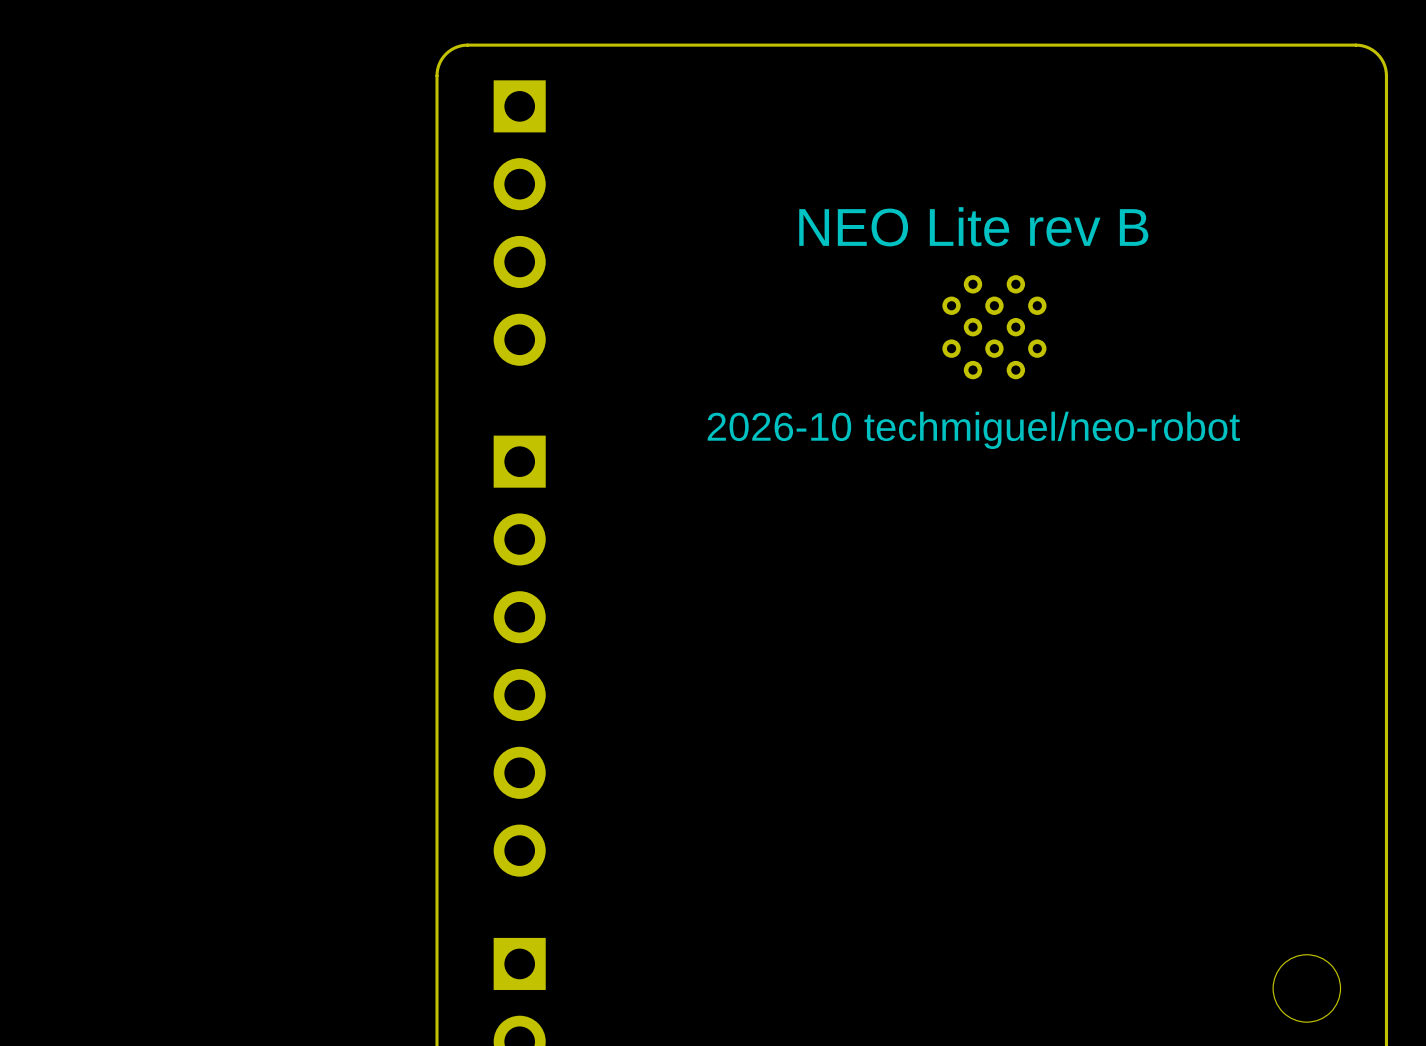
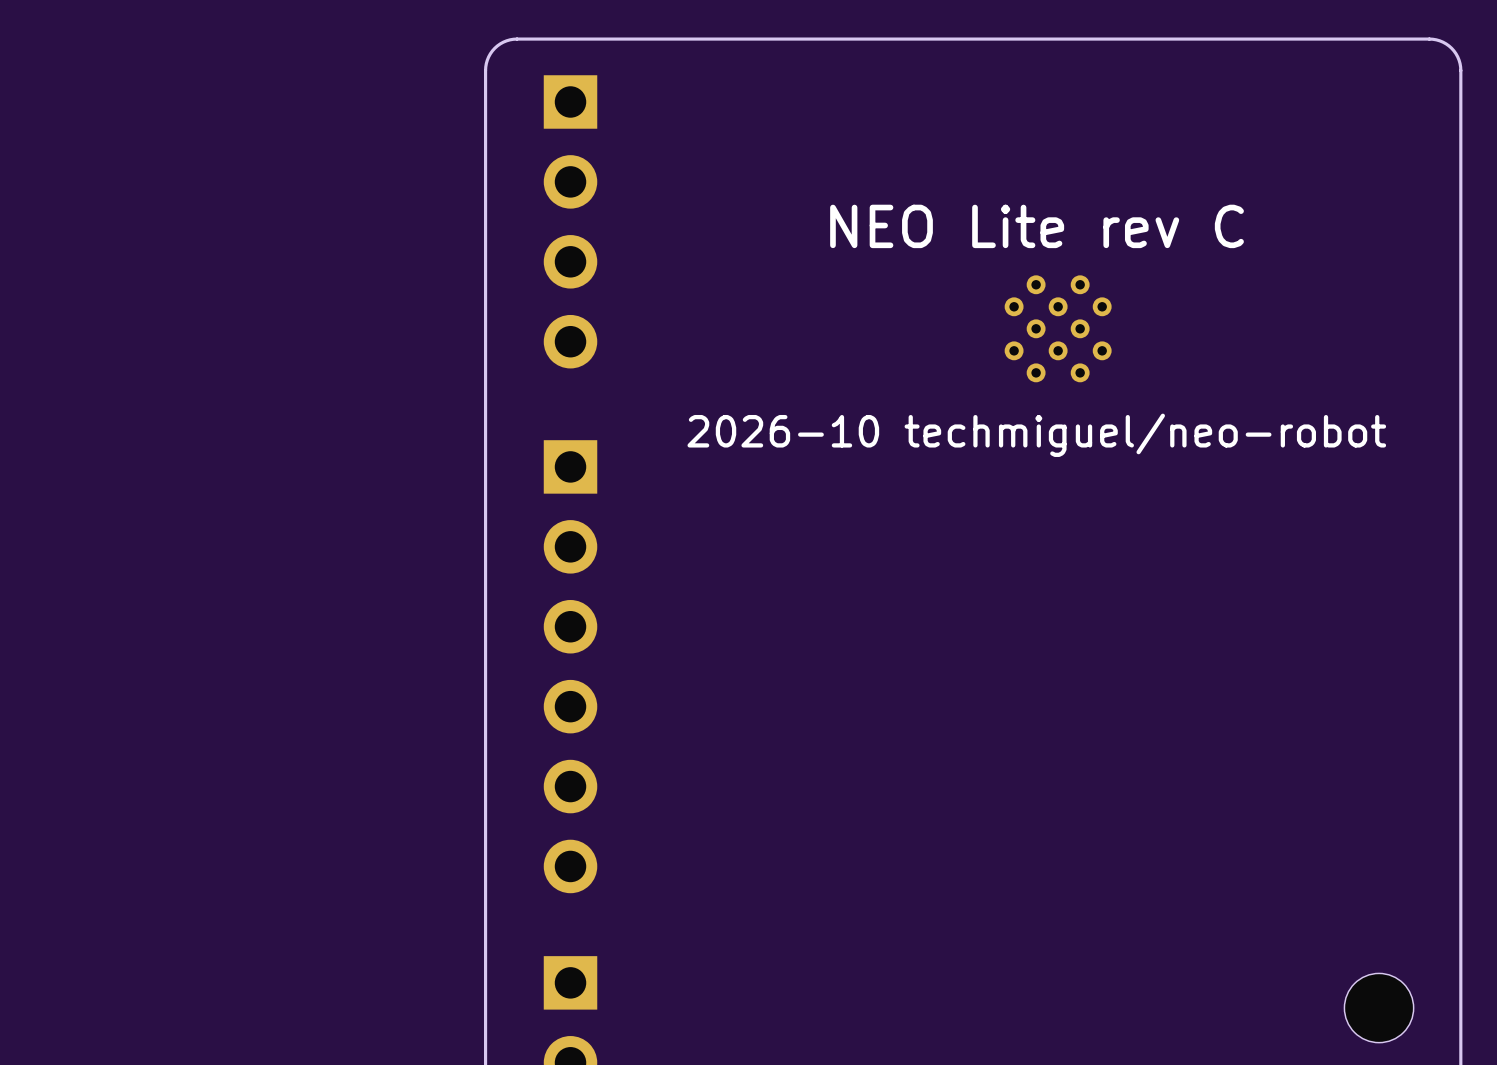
text: NEO Lite rev B (973, 226) -> NEO Lite rev C (1037, 226)

